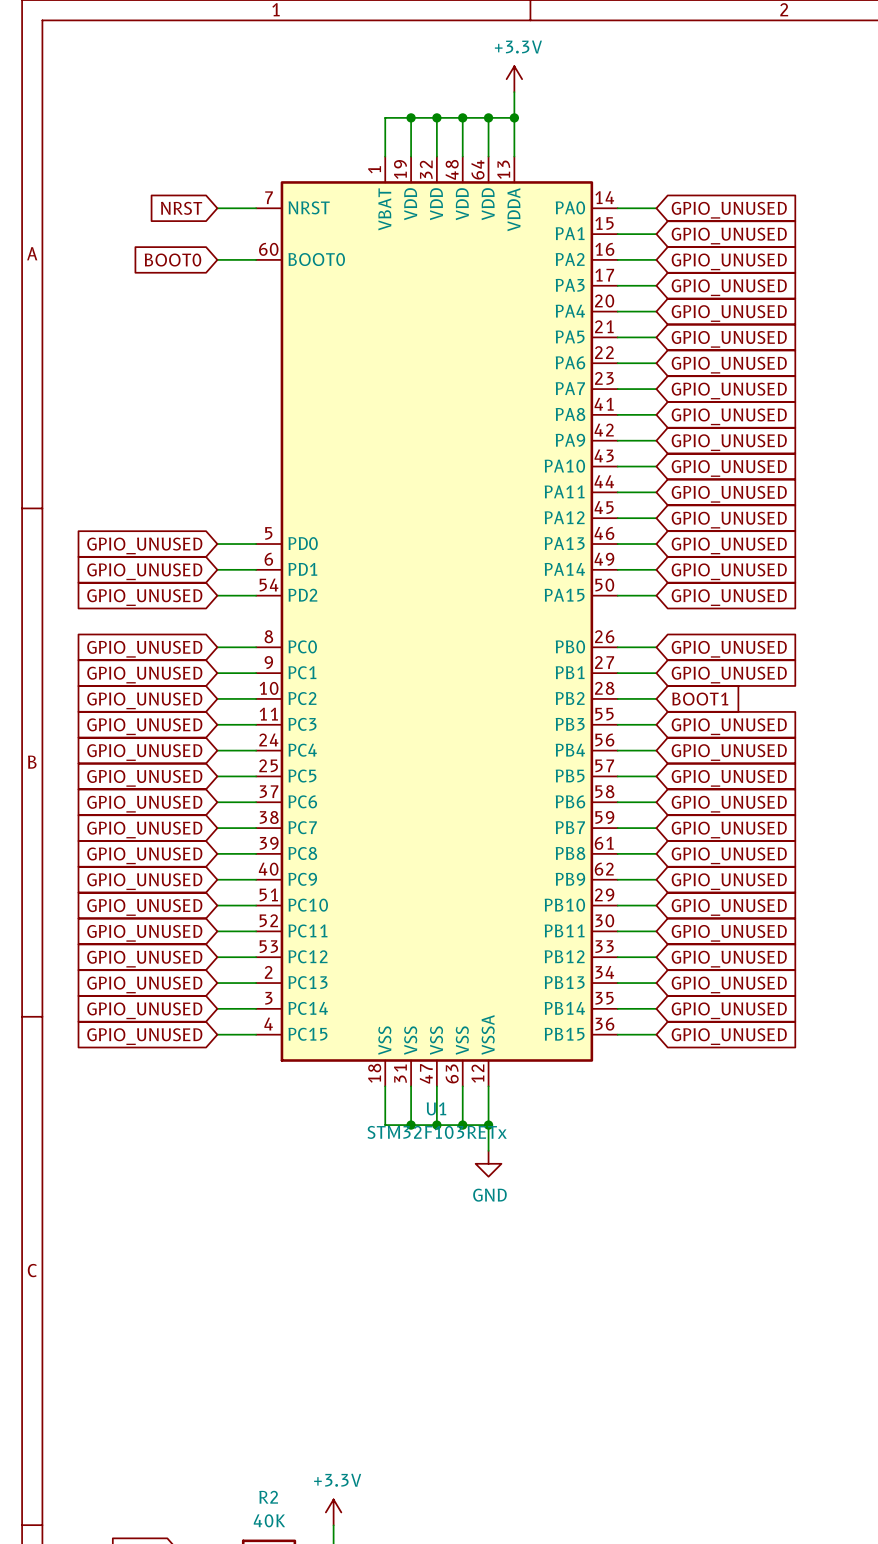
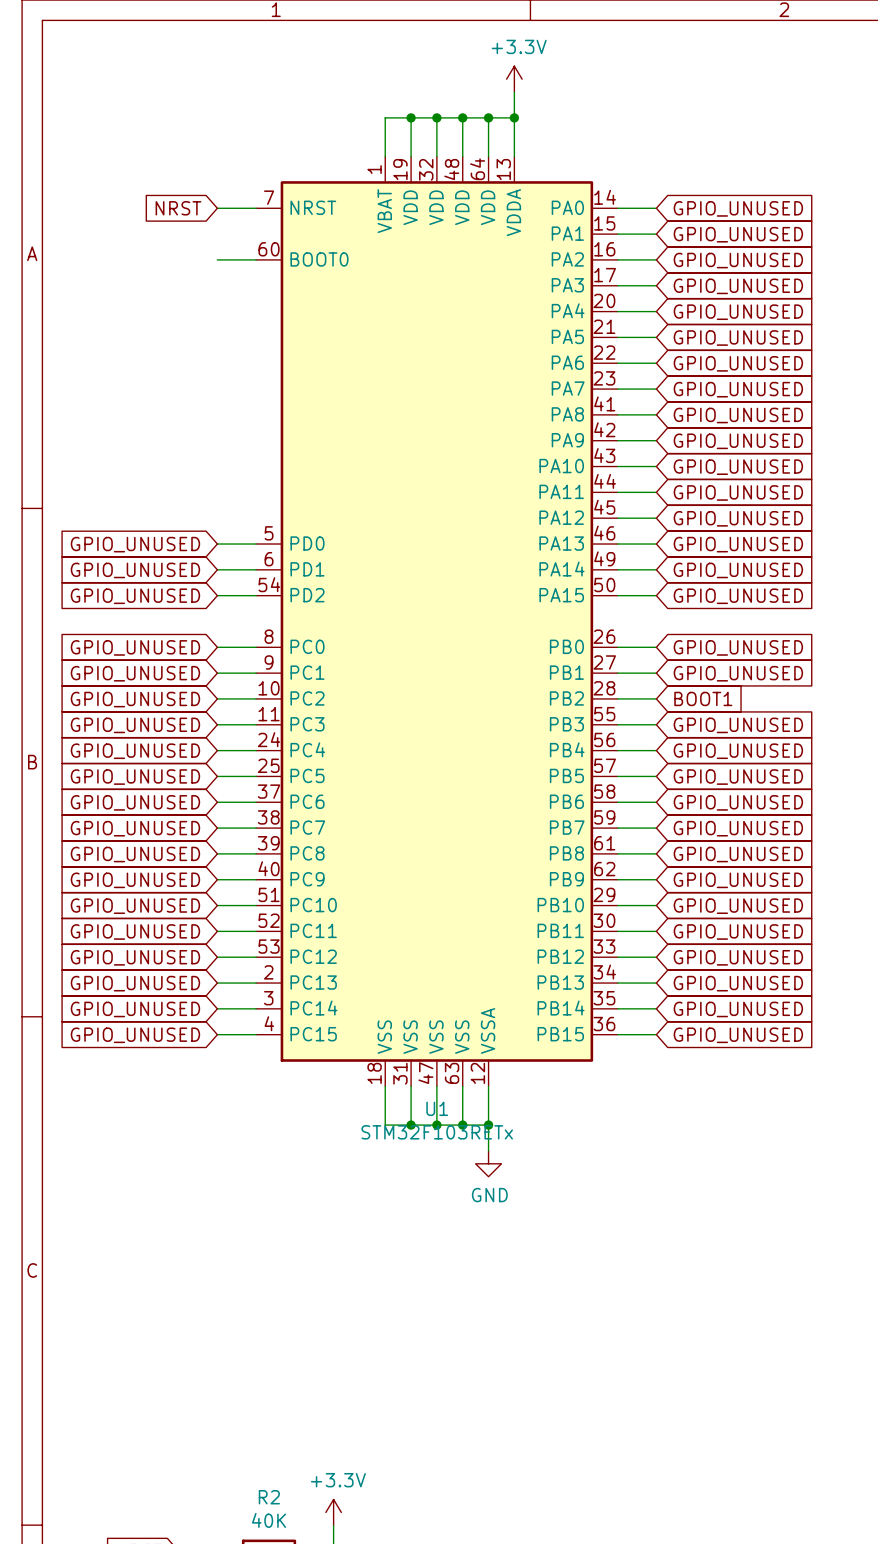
global label: BOOT0 (173, 260) -> none

